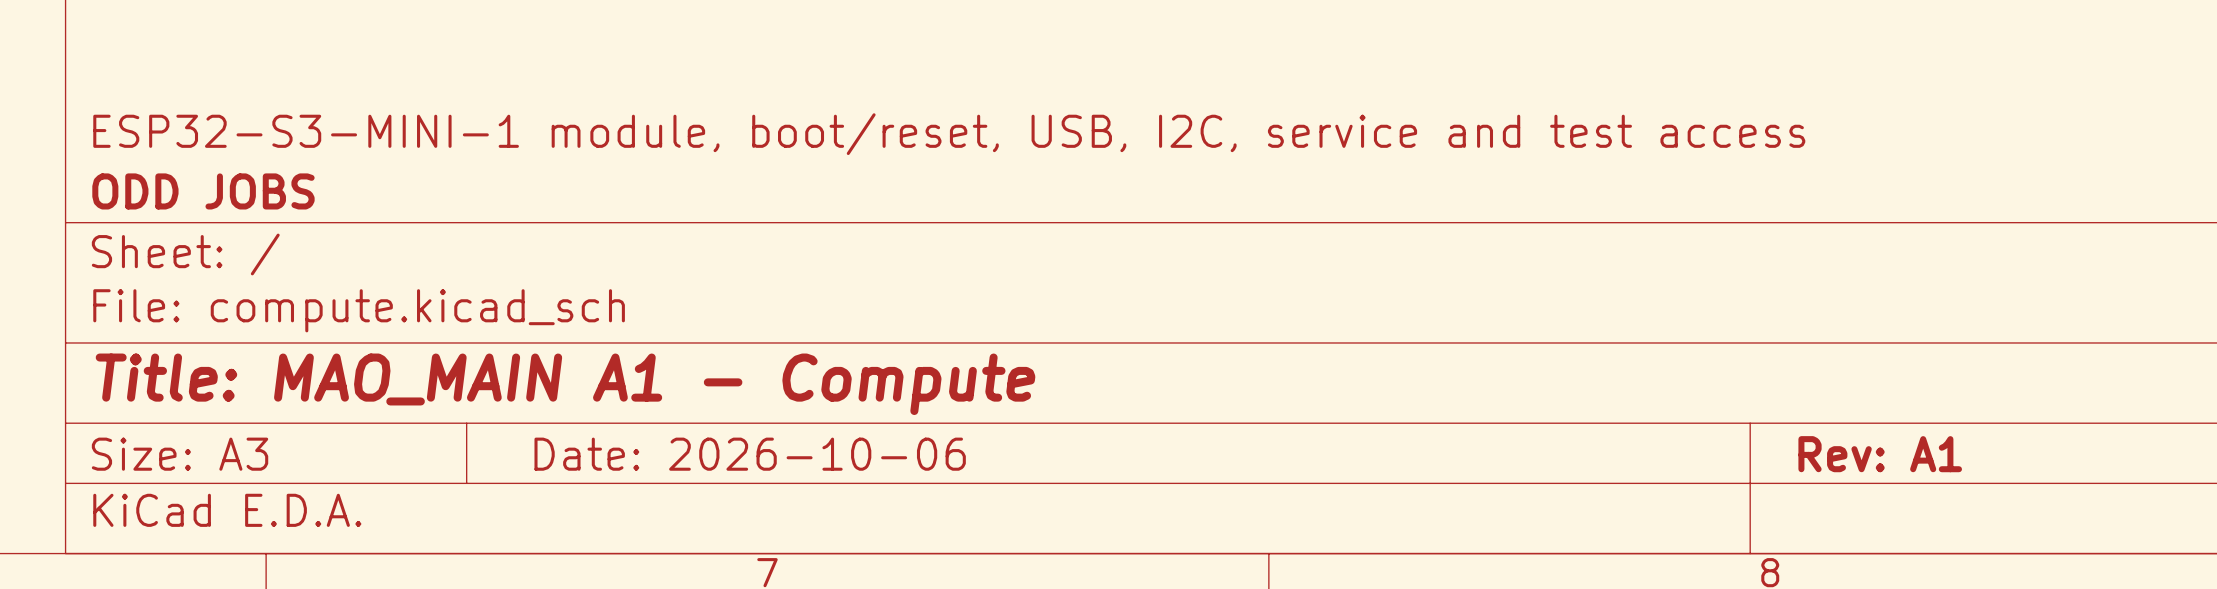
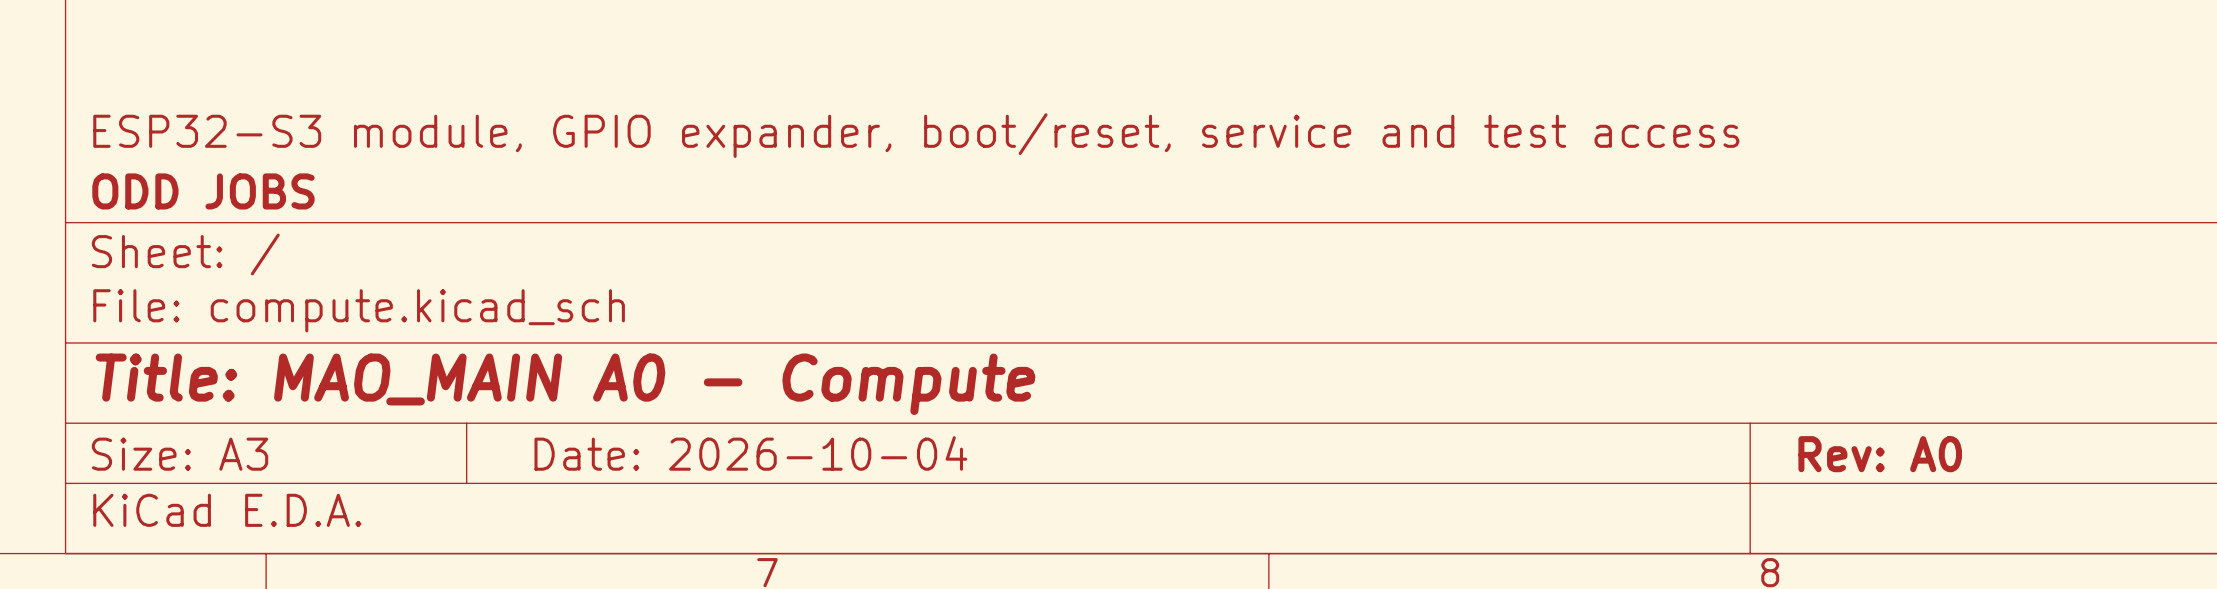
title block: ESP32-S3-MINI-1 module, boot/reset, USB, I2C, service and test access (949, 134) -> ESP32-S3 module, GPIO expander, boot/reset, service and test access (916, 135)
title block: Title: MAO_MAIN A1 - Compute (565, 384) -> Title: MAO_MAIN A0 - Compute (565, 384)
title block: Date: 2026-10-06 (750, 454) -> Date: 2026-10-04 (750, 453)
title block: Rev: A1 (1880, 454) -> Rev: A0 (1880, 454)

